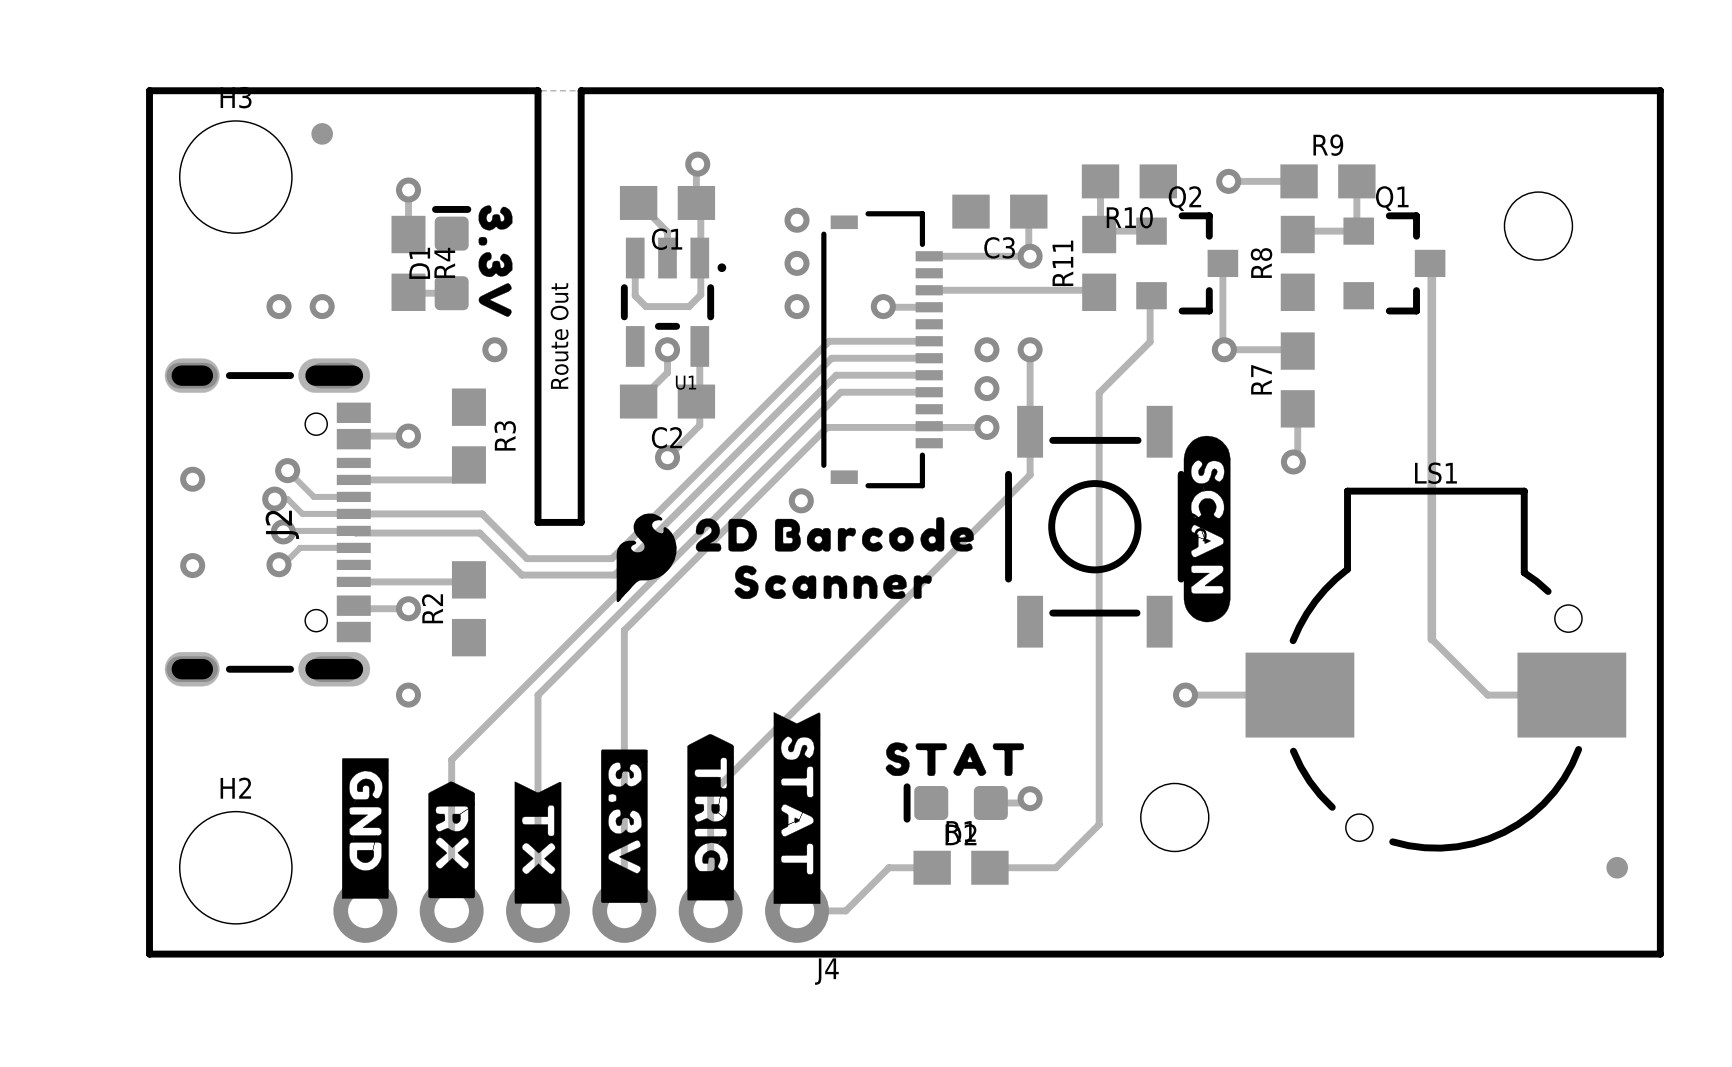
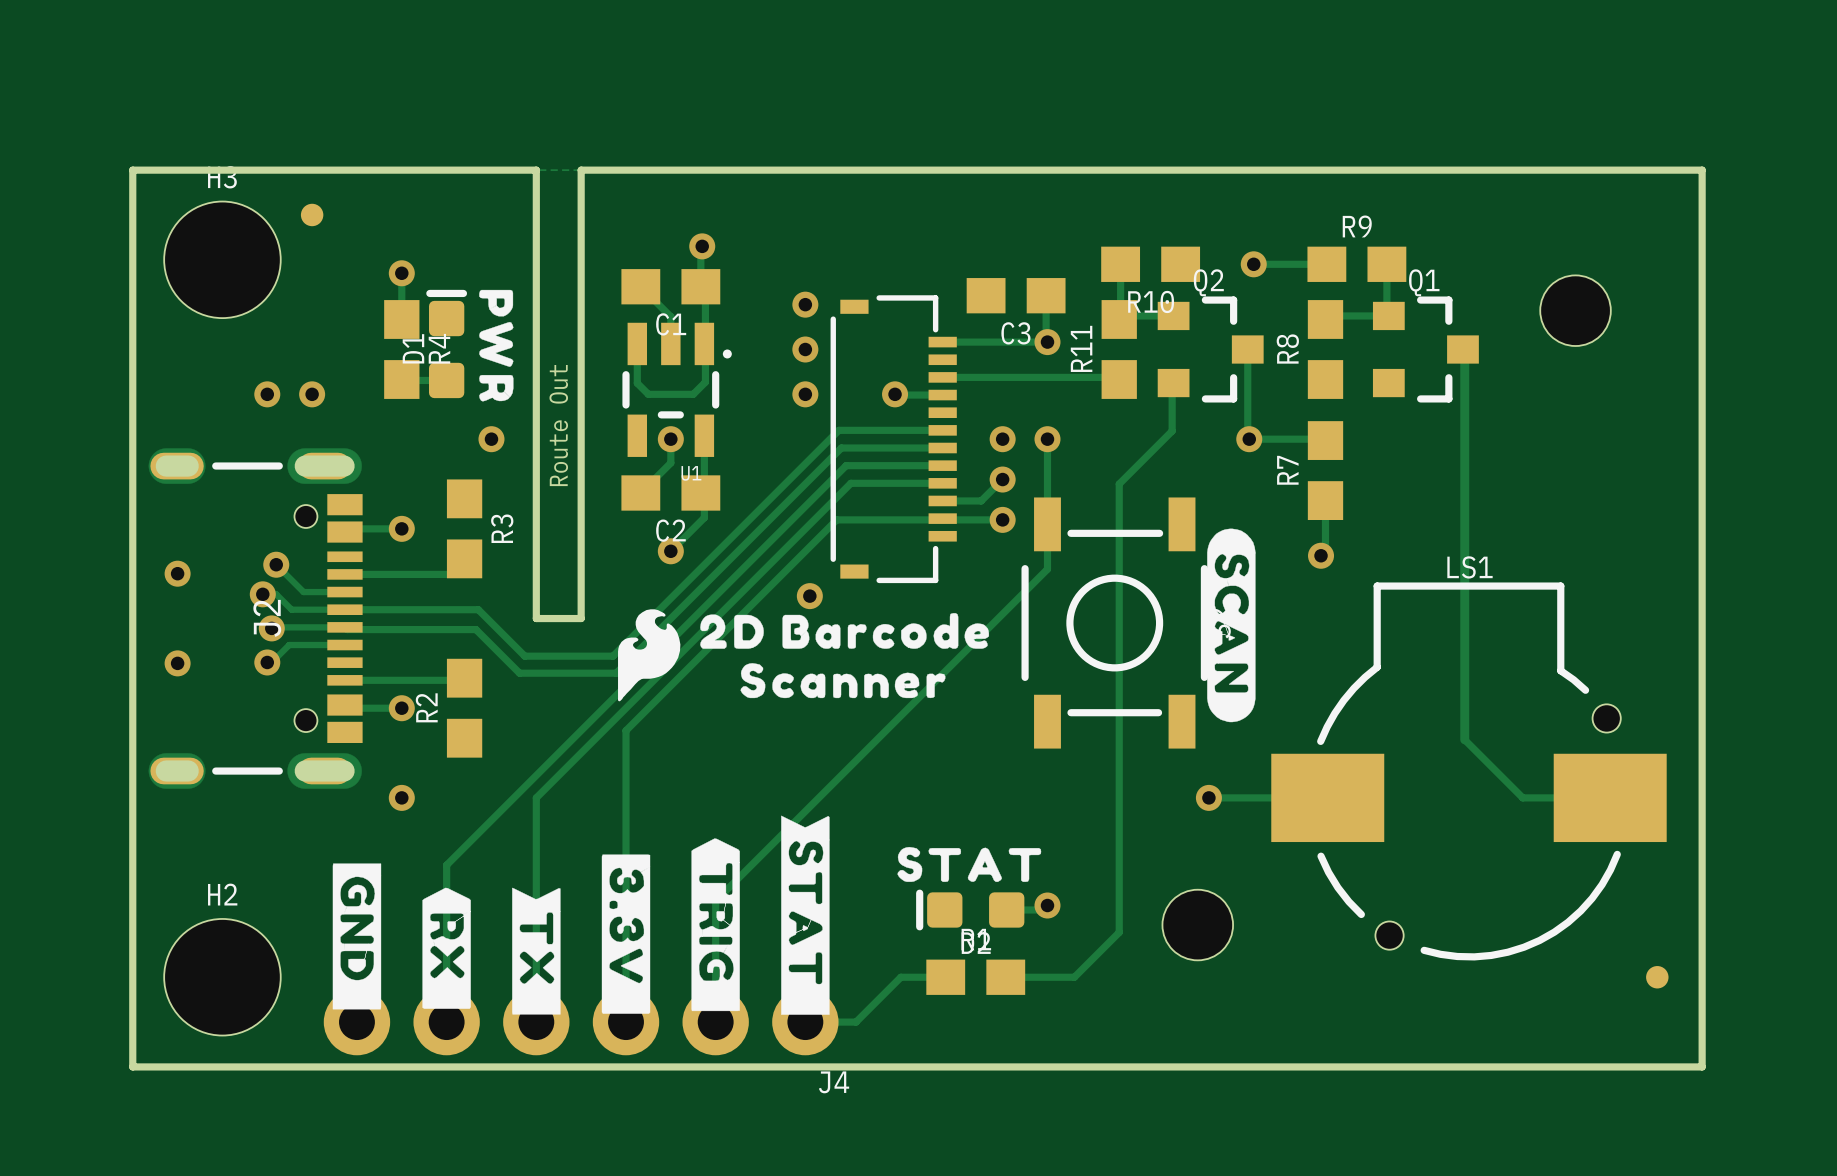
drawing shape: [478, 205, 513, 317] -> [479, 289, 514, 402]
track: none -> (1002, 479) (981, 500) (942, 500)

